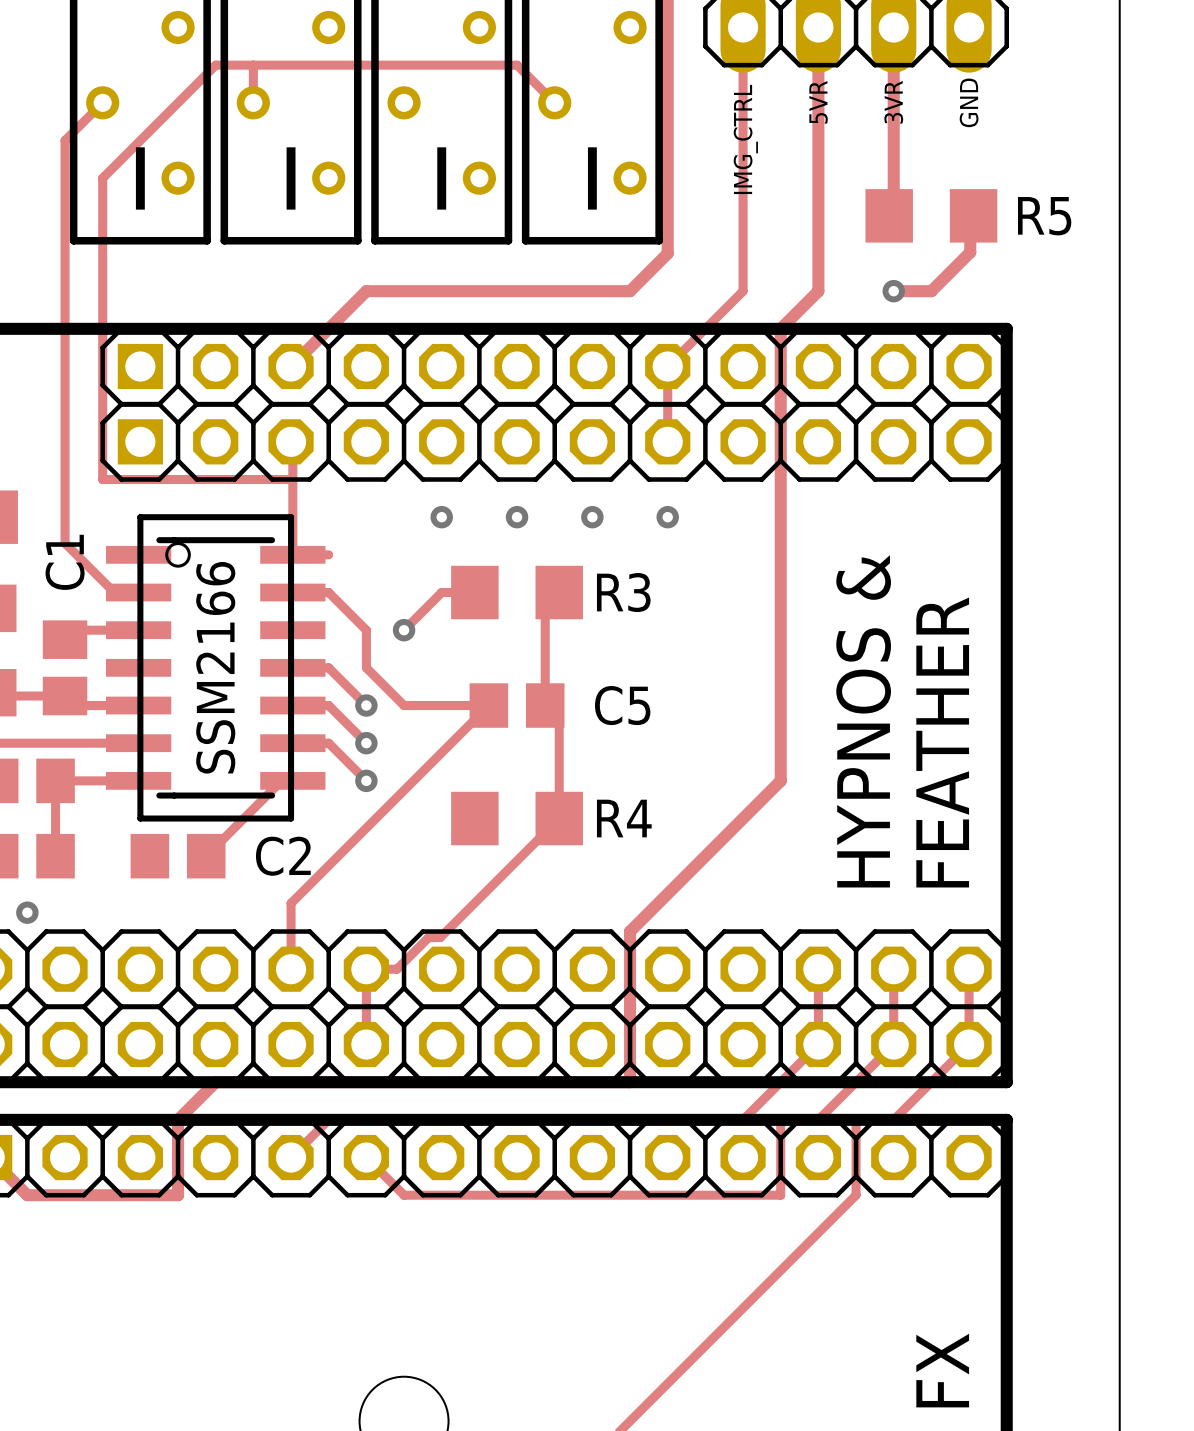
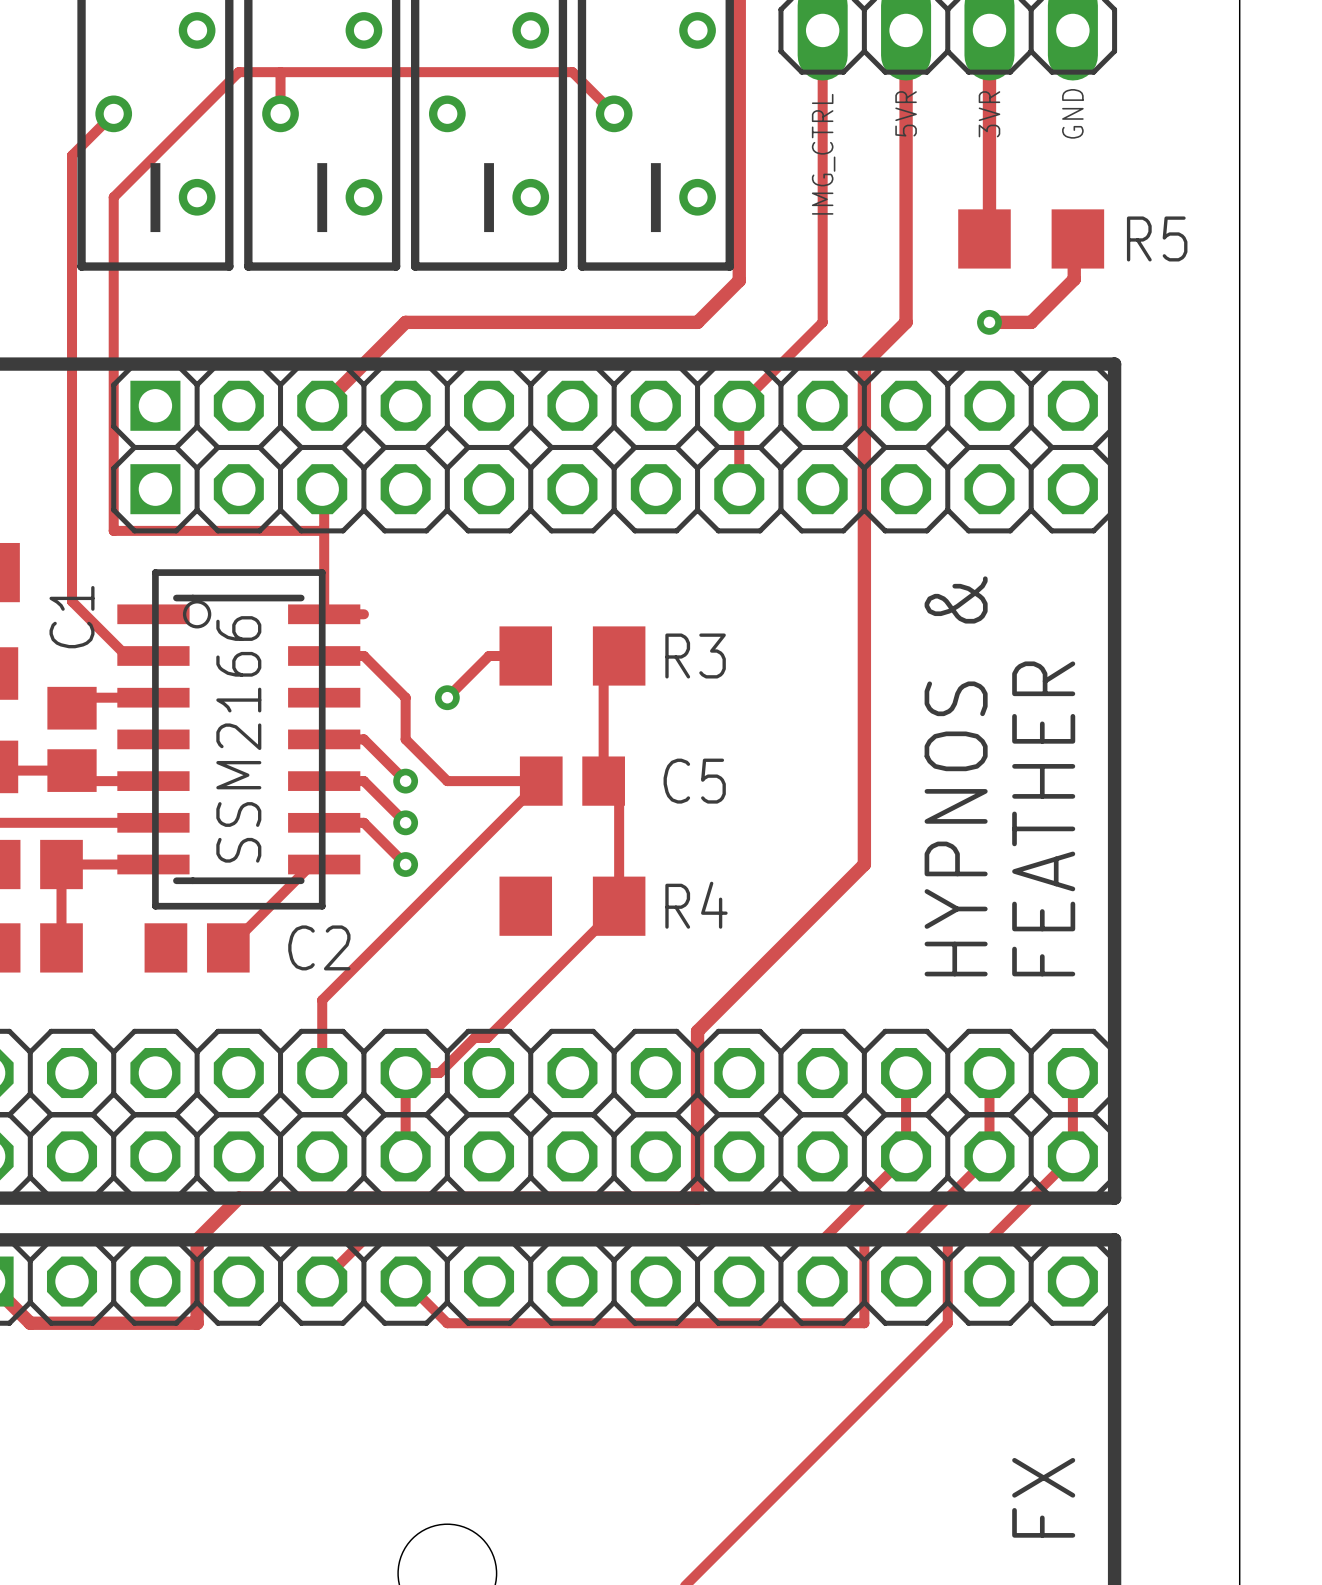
via: (441, 517) -> none
via: (517, 517) -> none
via: (592, 517) -> none
via: (667, 517) -> none
via: (27, 912) -> none

